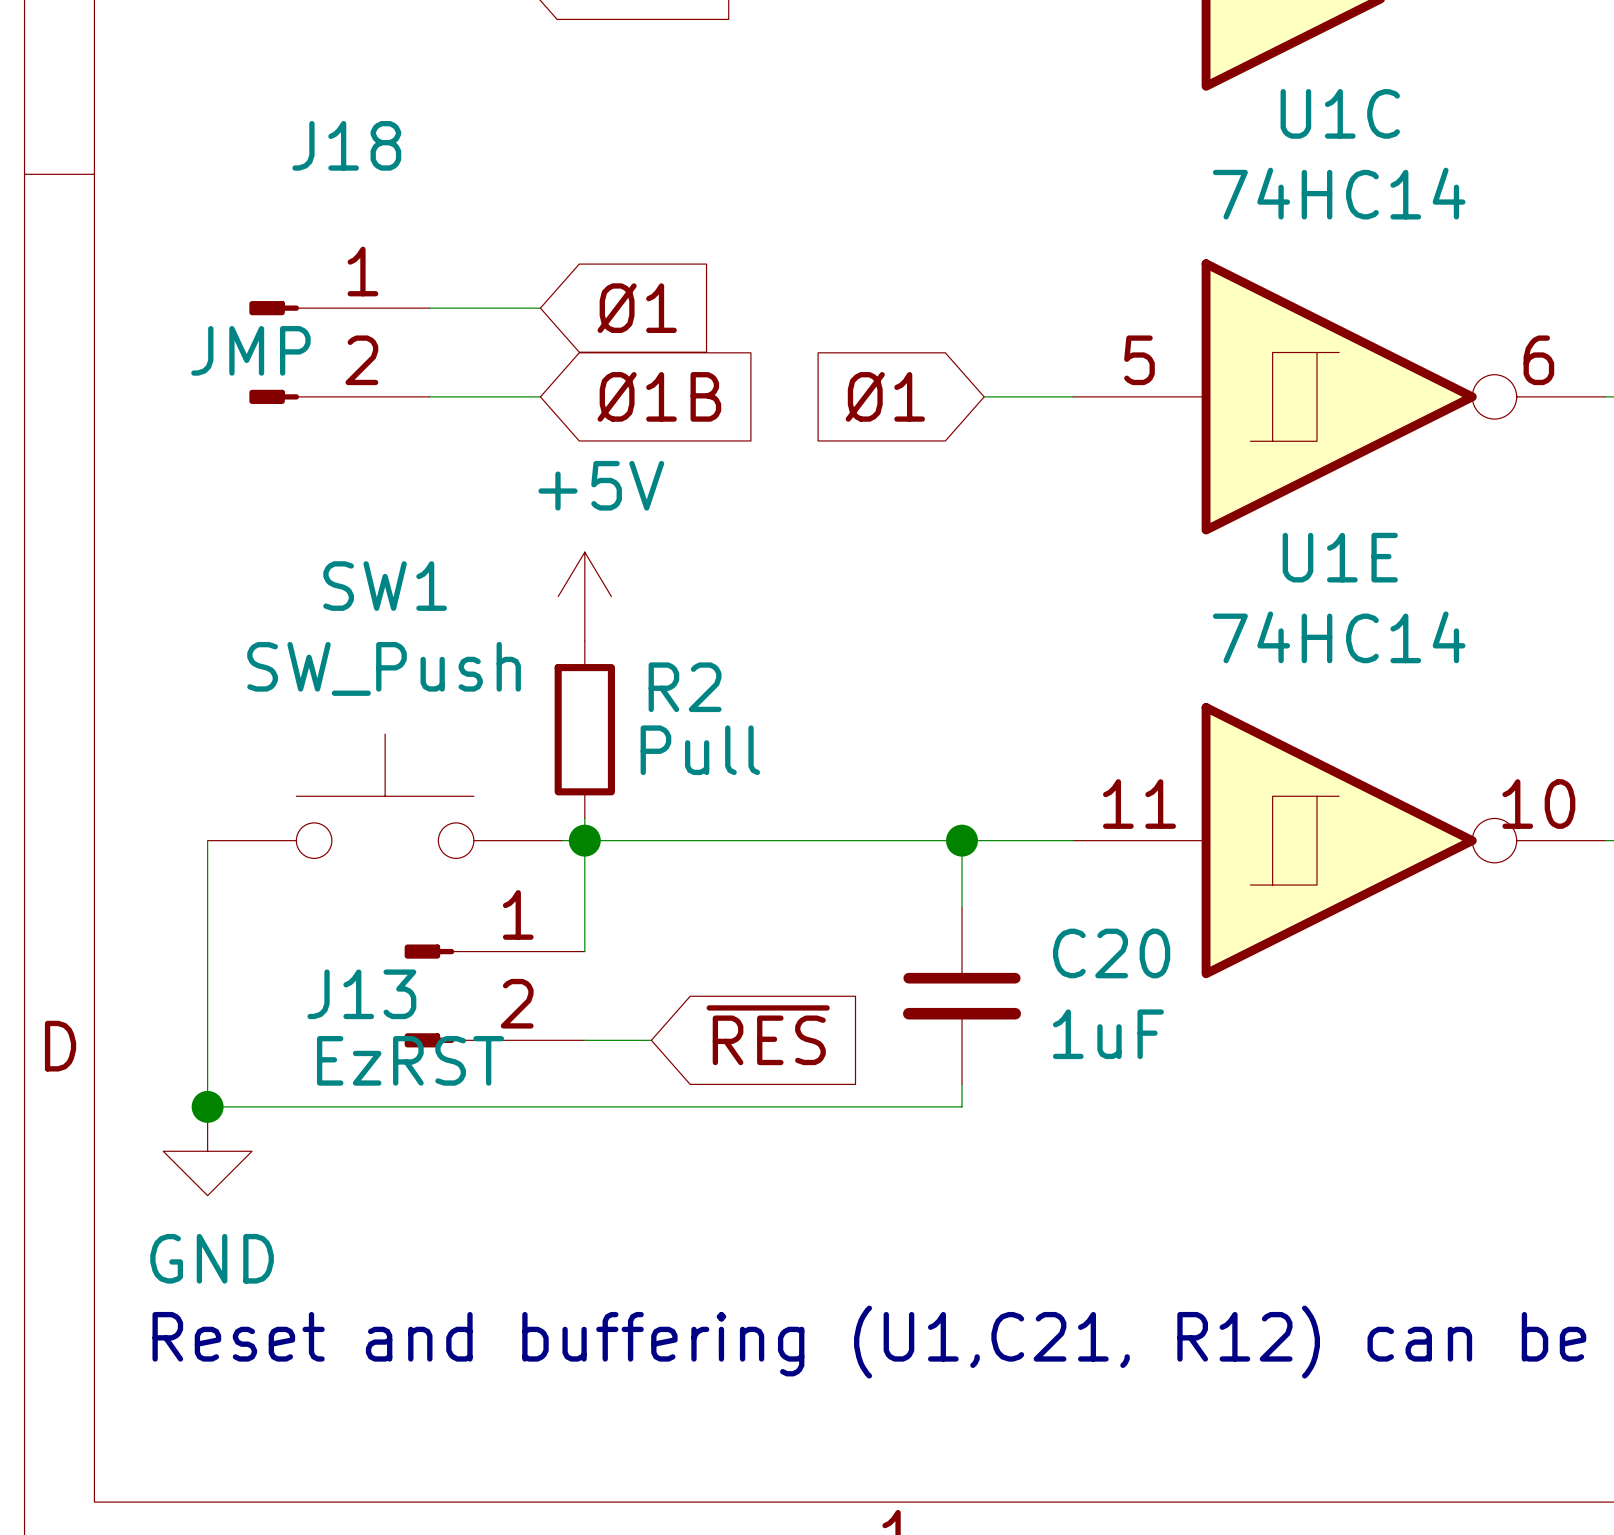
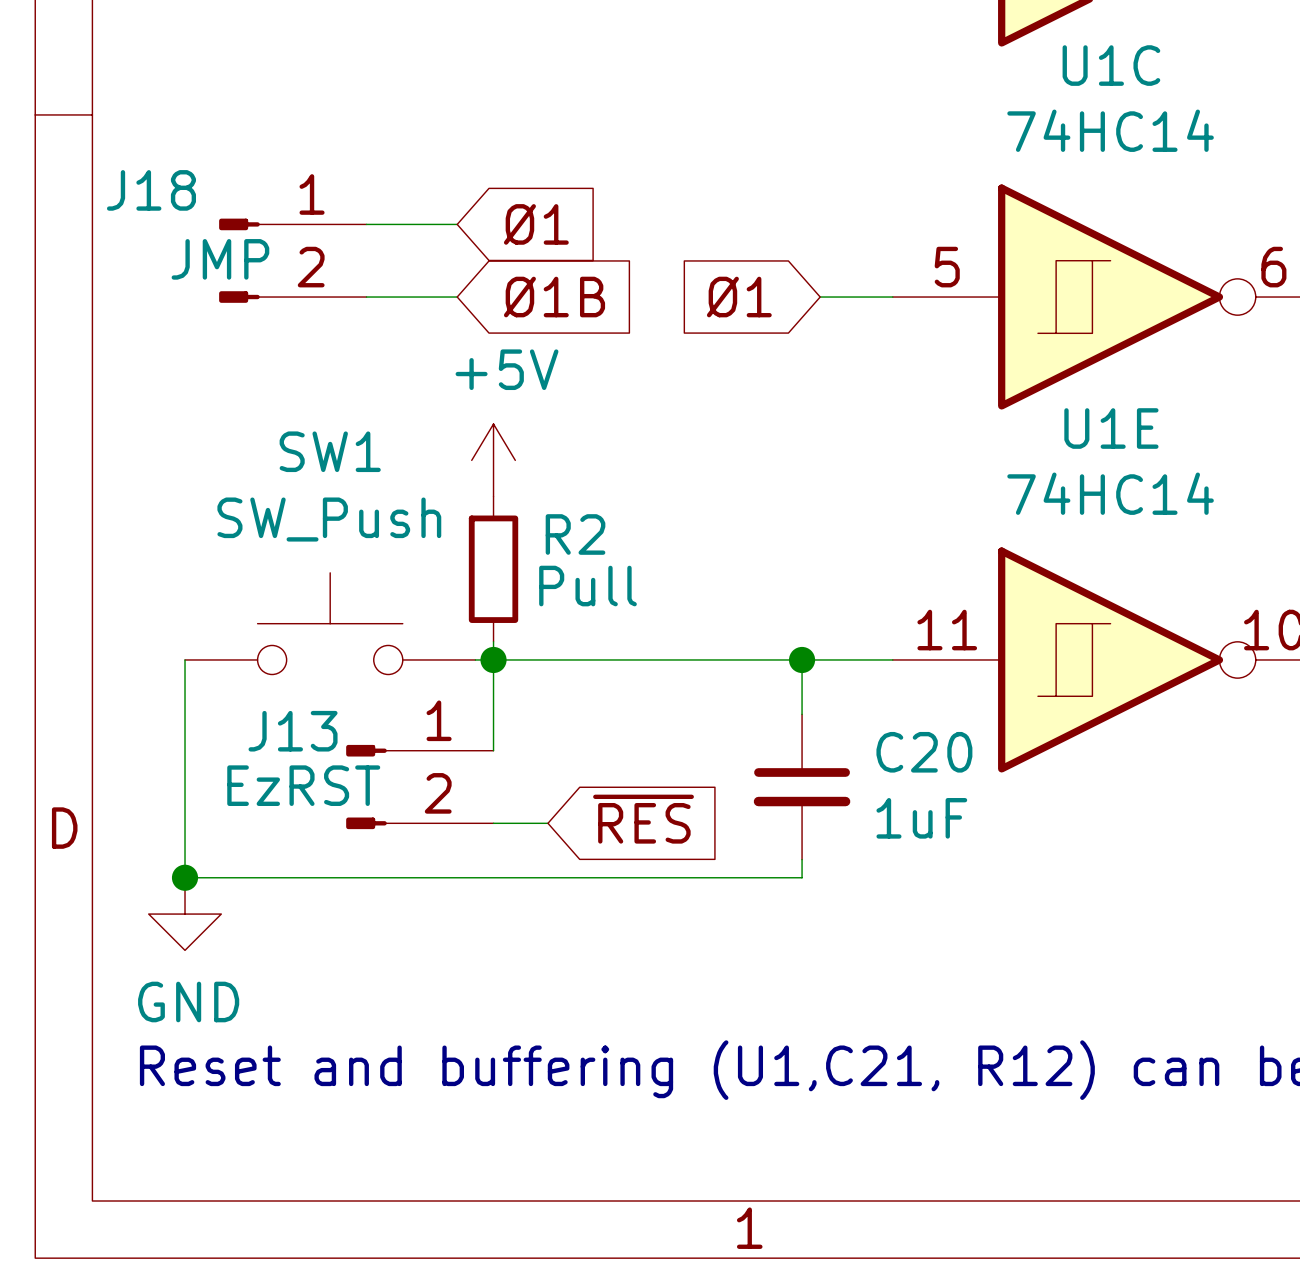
J18 name position: J18 (346, 145) -> J18 (151, 190)
J13 name position: J13 (361, 994) -> J13 (293, 731)
J13 value position: EzRST (410, 1060) -> EzRST (303, 785)

